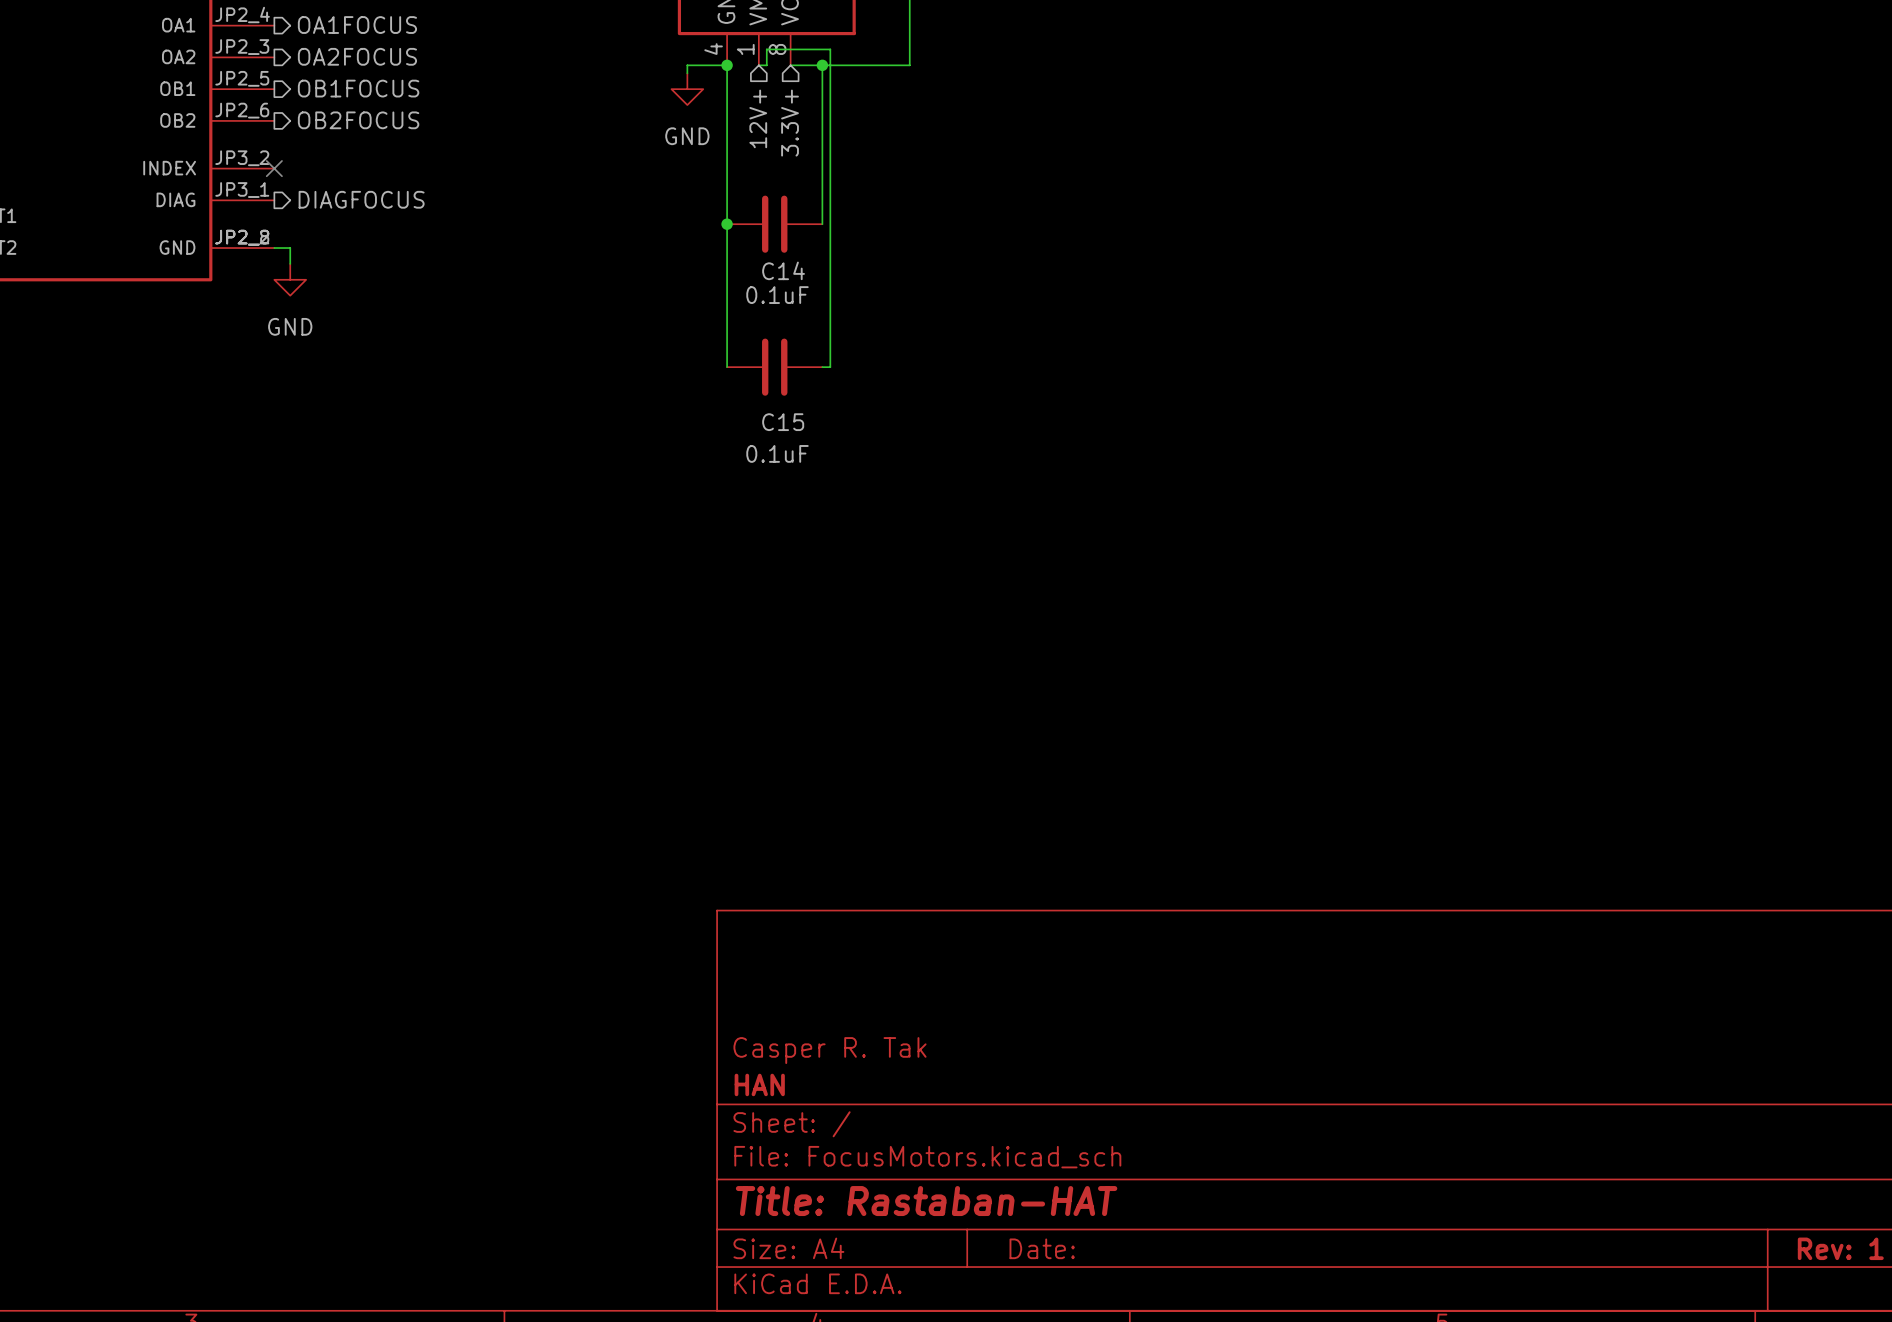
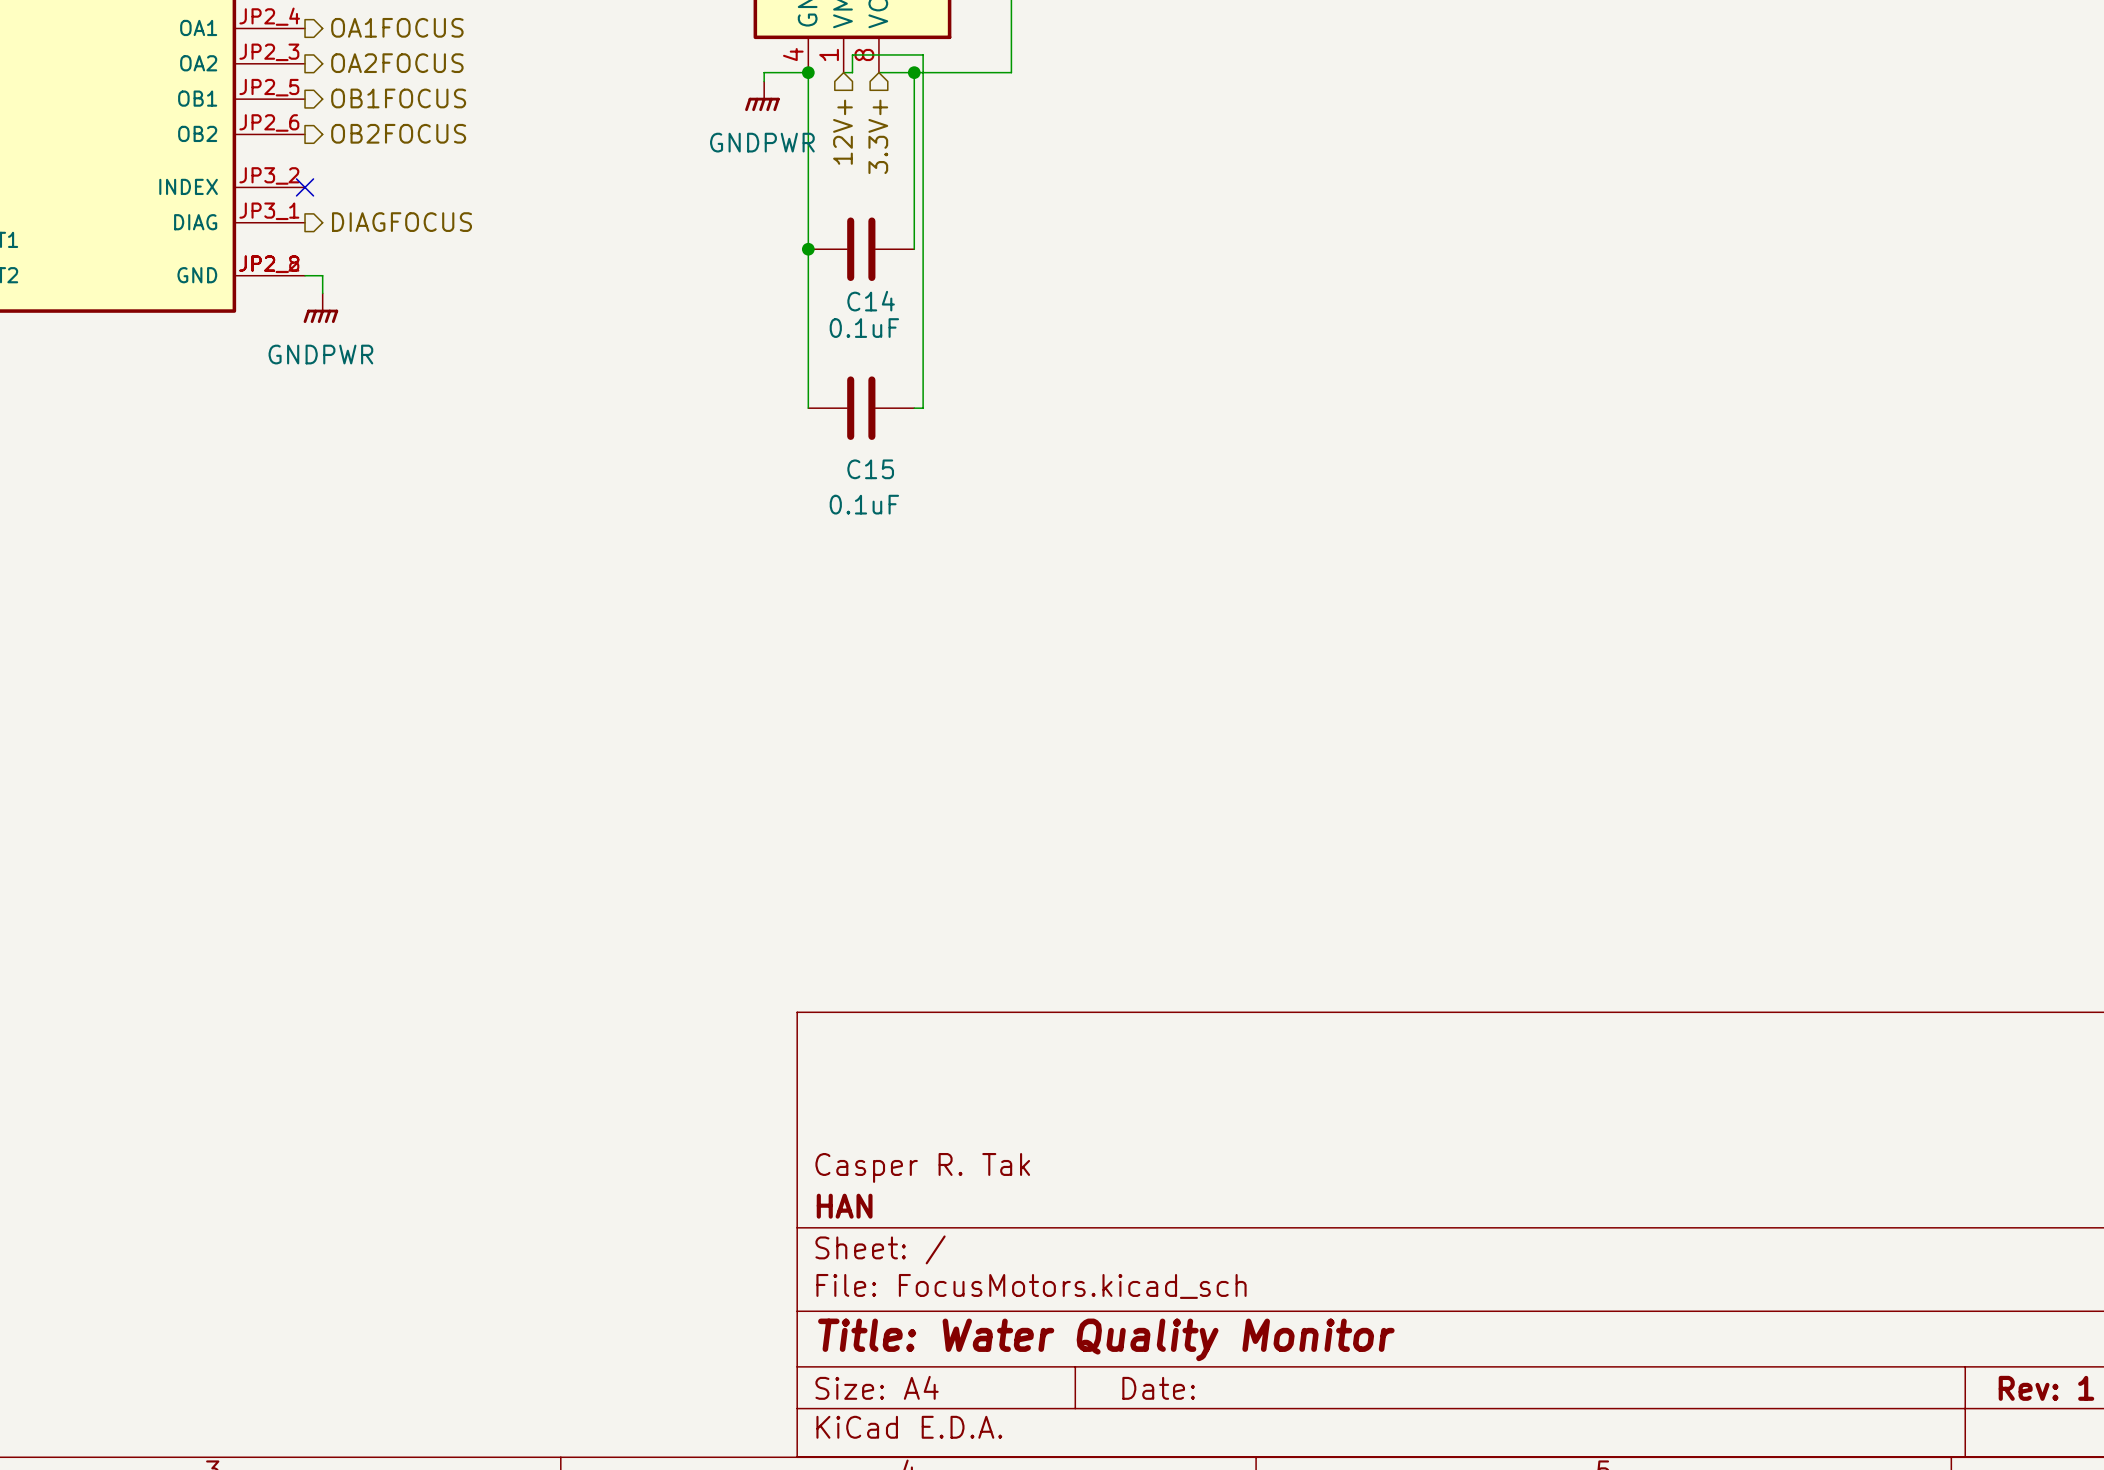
power symbol: GND (687, 89) -> GNDPWR (762, 96)
power symbol: GND (290, 279) -> GNDPWR (320, 308)
title block: Title: Rastaban-HAT (926, 1201) -> Title: Water Quality Monitor (1106, 1339)

